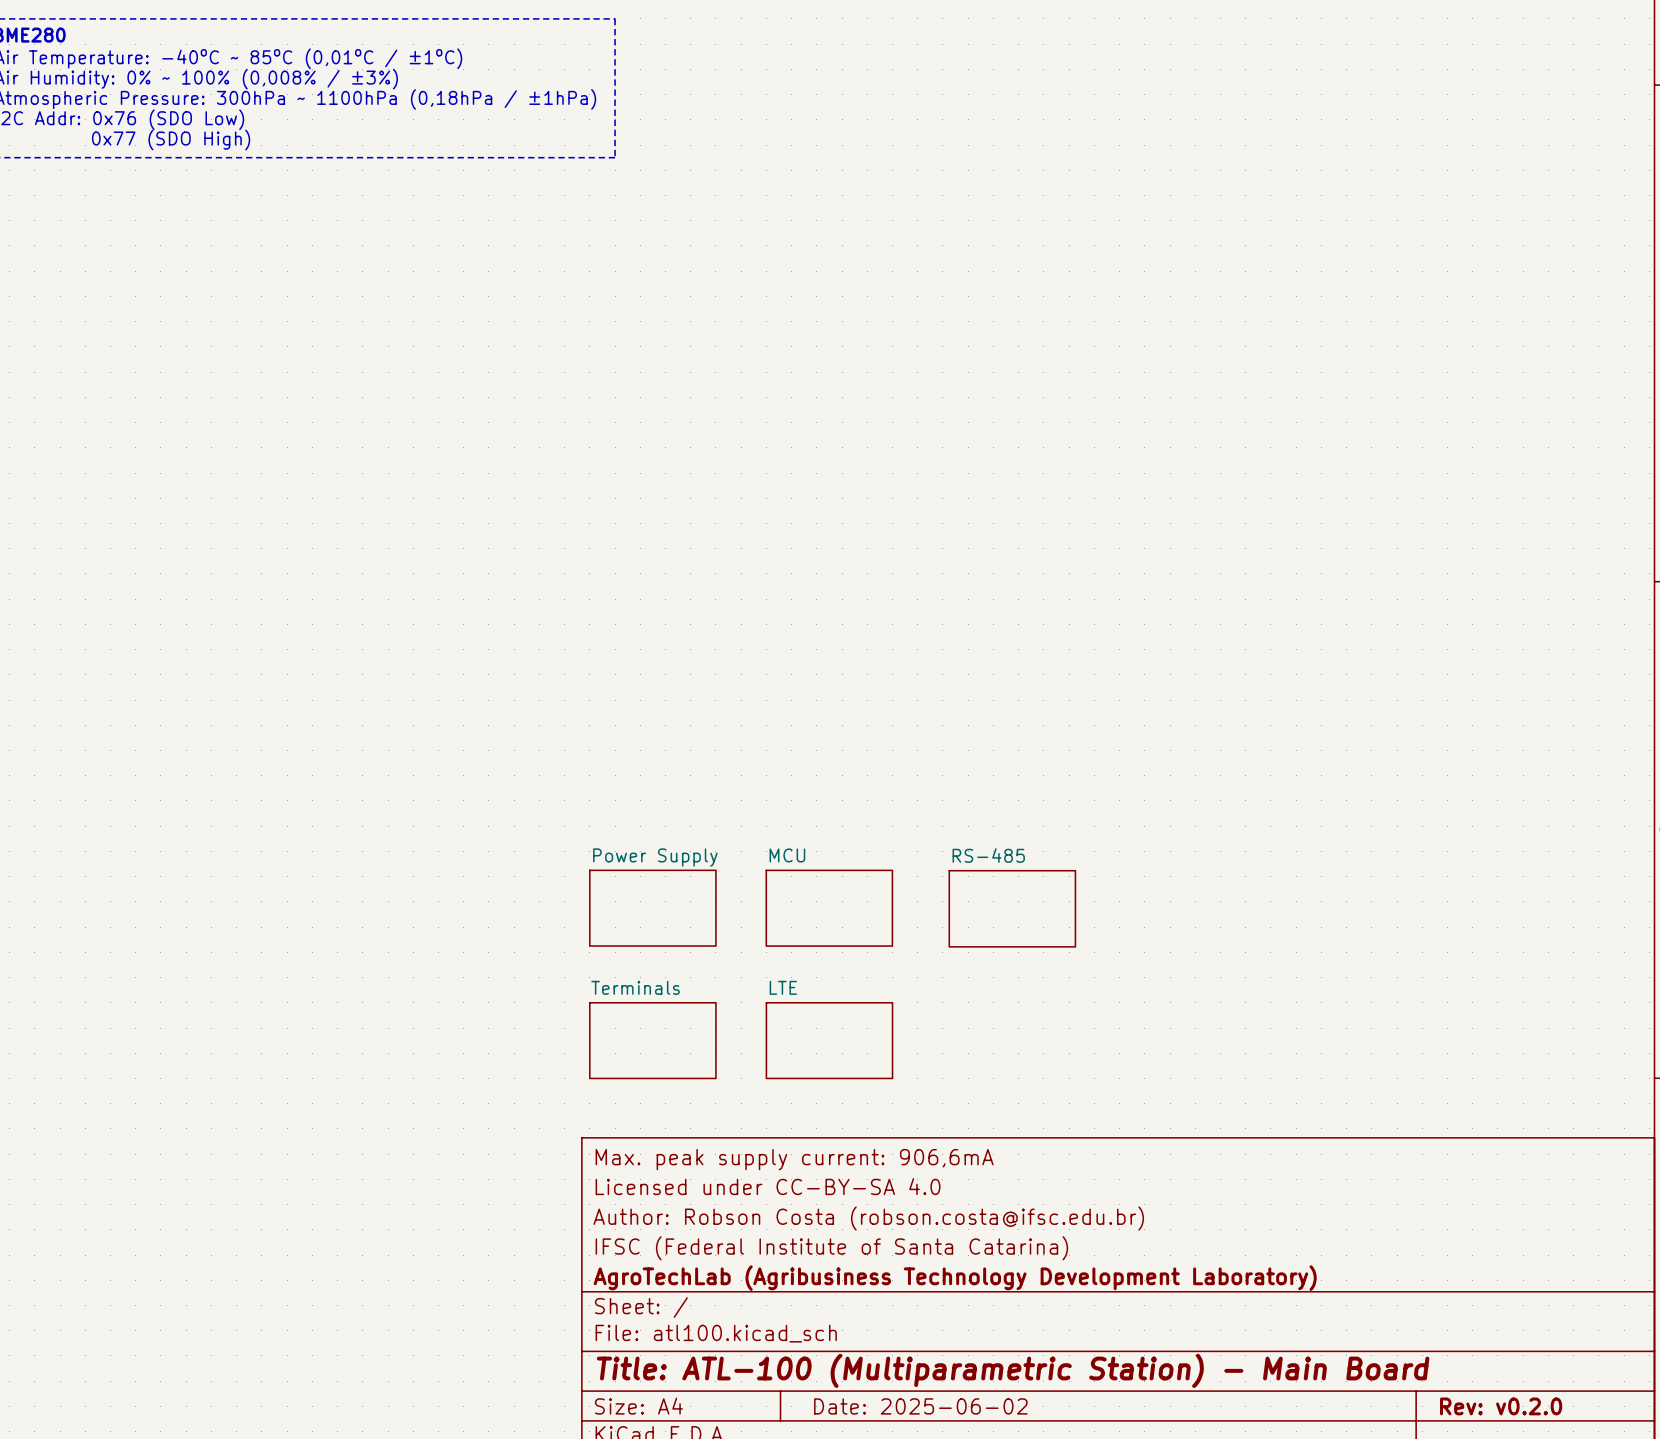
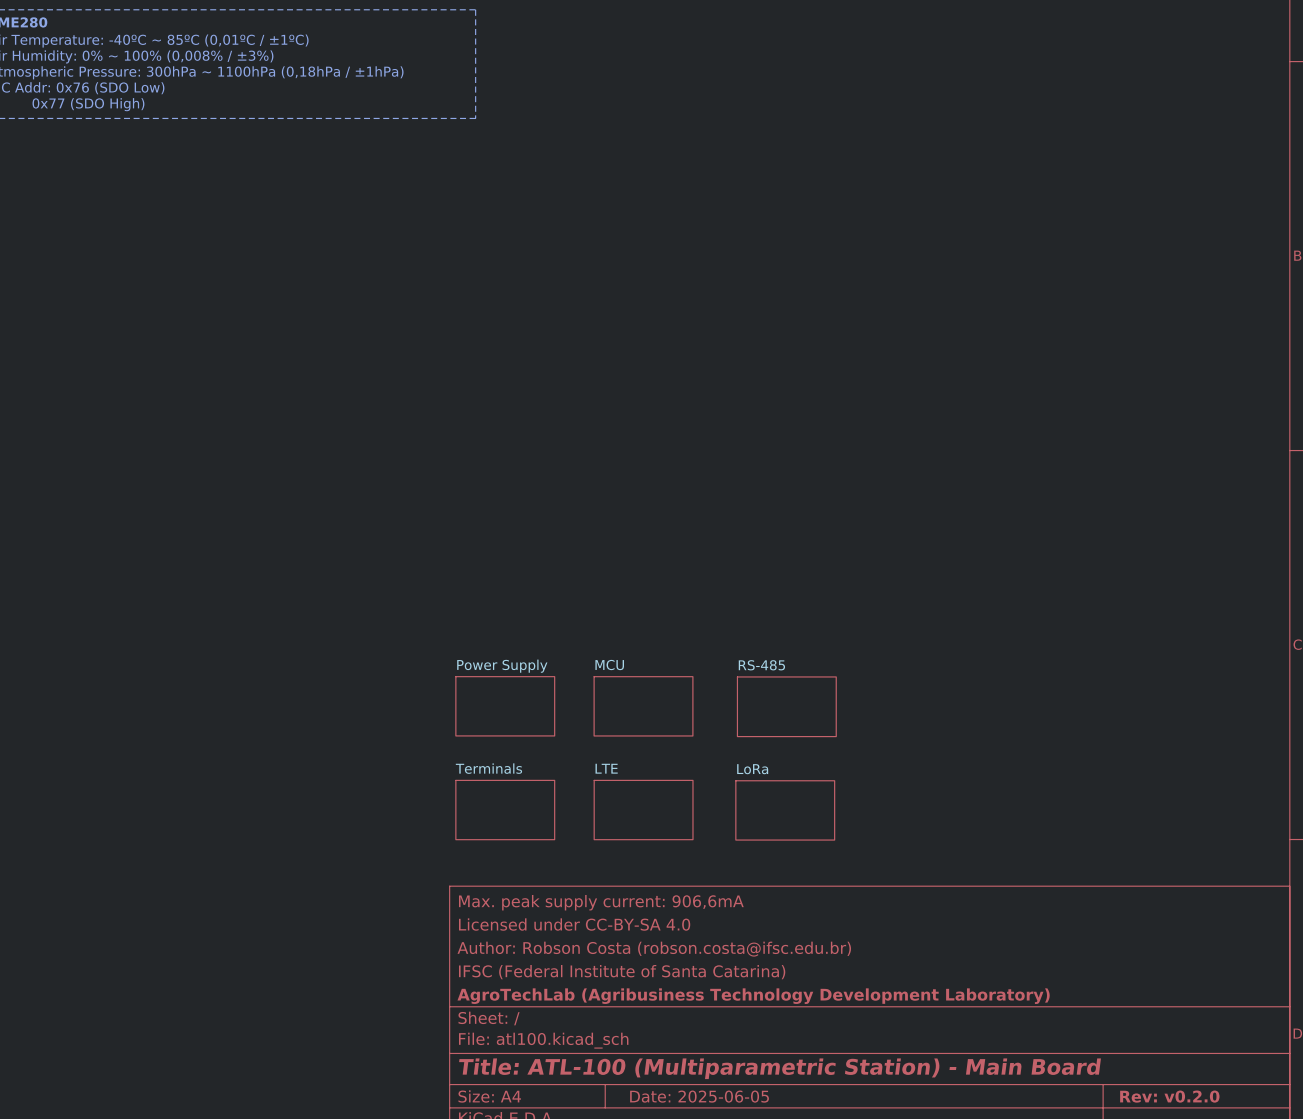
sheet LoRa: none -> (785, 810)
title block: Date: 2025-06-02 (920, 1406) -> Date: 2025-06-05 (699, 1096)

